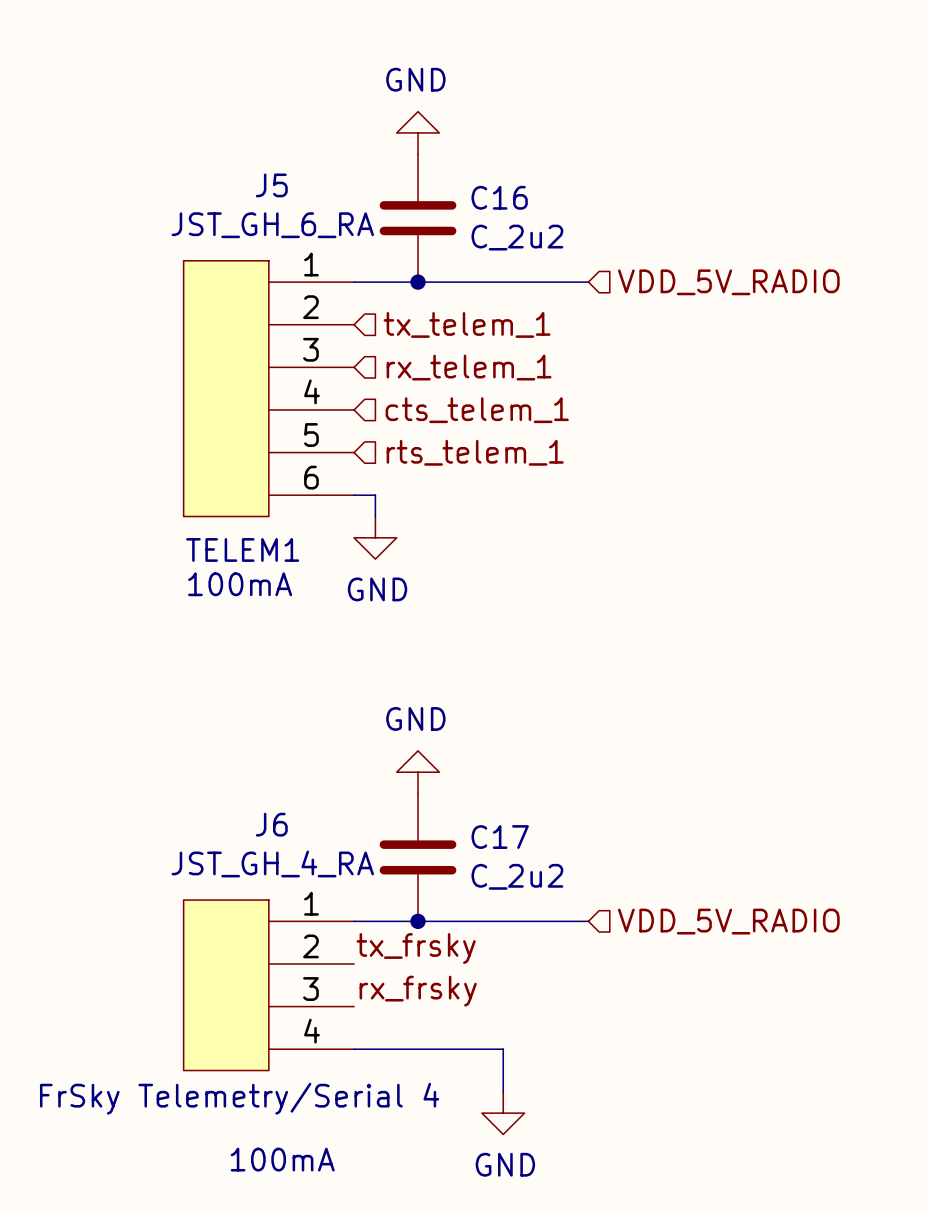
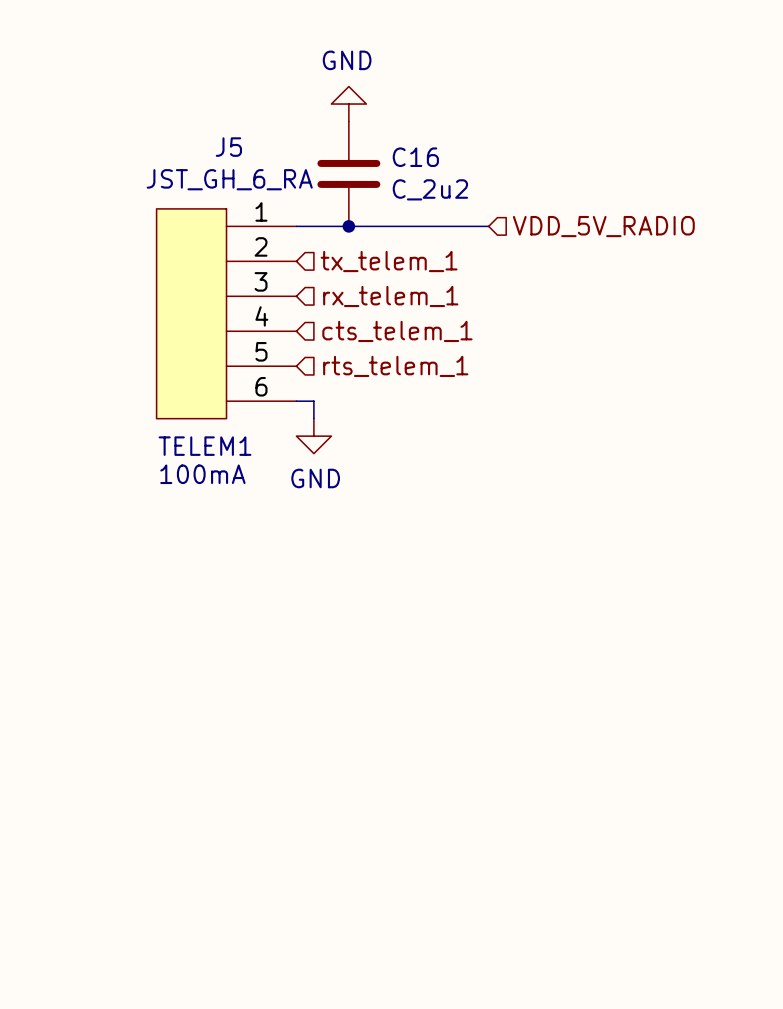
power symbol: GND (418, 772) -> none
C17: C_2u2 (418, 857) -> none
wire: (354, 921) (588, 921) -> none
junction: (418, 921) -> none
hierarchical label: VDD_5V_RADIO (728, 921) -> none
label: tx_frsky (416, 948) -> none
J6: JST_GH_4_RA (268, 985) -> none
label: rx_frsky (418, 991) -> none
wire: (354, 1049) (503, 1049) (503, 1091) -> none
text: FrSky Telemetry/Serial 4 (239, 1098) -> none
power symbol: GND (503, 1113) -> none
text: 100mA (282, 1159) -> none

